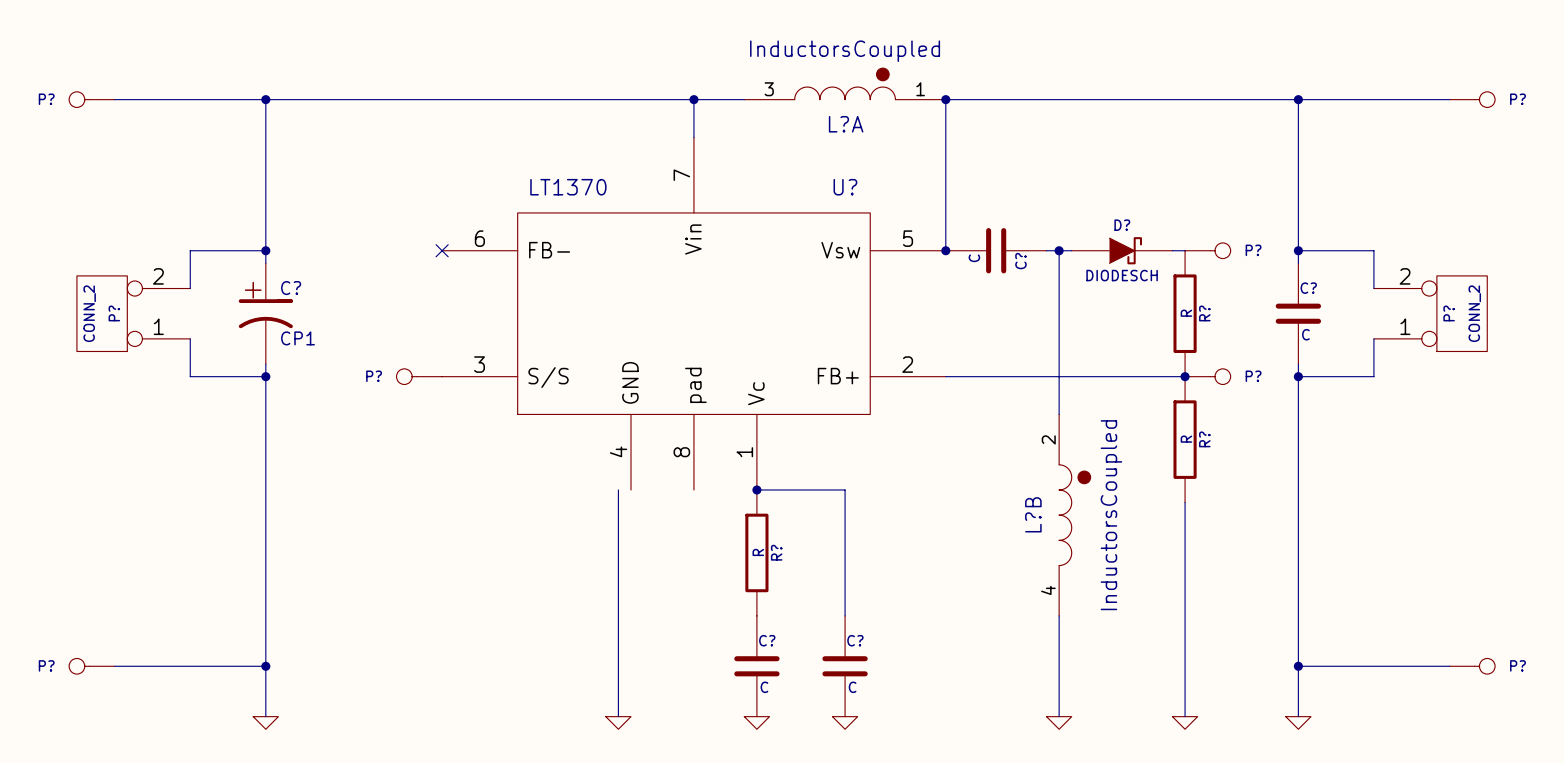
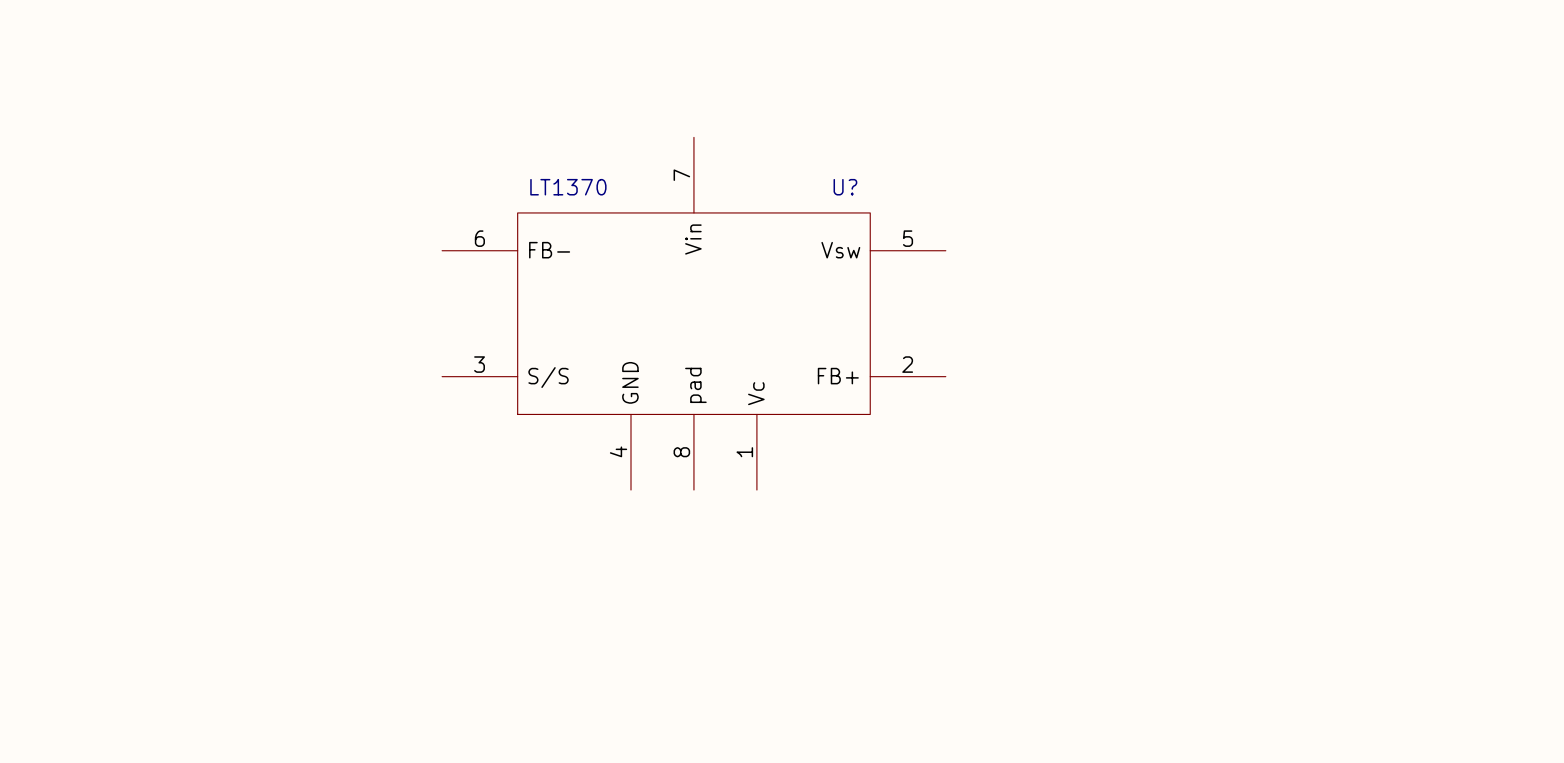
L?A: InductorsCoupled (845, 83) -> none
P?: (91, 99) -> none
wire: (114, 99) (744, 99) -> none
wire: (265, 99) (265, 263) -> none
junction: (265, 99) -> none
wire: (693, 99) (693, 137) -> none
junction: (693, 99) -> none
junction: (945, 99) -> none
wire: (1298, 99) (1298, 263) -> none
junction: (1298, 99) -> none
wire: (1449, 99) (945, 99) (945, 250) -> none
P?: (1472, 99) -> none
wire: (265, 250) (190, 250) (190, 288) -> none
junction: (265, 250) -> none
no-connect mark: (442, 250) -> none
junction: (945, 250) -> none
C?: C (996, 250) -> none
wire: (1046, 250) (1071, 250) -> none
wire: (1059, 250) (1059, 414) -> none
junction: (1059, 250) -> none
D?: DIODESCH (1122, 250) -> none
wire: (1172, 250) (1185, 250) -> none
P?: (1207, 250) -> none
wire: (1298, 250) (1373, 250) (1373, 288) -> none
junction: (1298, 250) -> none
P?: CONN_2 (133, 313) -> none
C?: CP1 (265, 313) -> none
R?: R (1185, 313) -> none
C?: C (1298, 313) -> none
P?: CONN_2 (1430, 313) -> none
wire: (190, 338) (190, 376) (265, 376) -> none
wire: (1373, 338) (1373, 376) (1298, 376) -> none
wire: (265, 364) (265, 716) -> none
wire: (1298, 364) (1298, 716) -> none
junction: (265, 376) -> none
P?: (419, 376) -> none
wire: (945, 376) (1185, 376) -> none
junction: (1185, 376) -> none
P?: (1207, 376) -> none
junction: (1298, 376) -> none
R?: R (1185, 439) -> none
wire: (618, 489) (618, 716) -> none
wire: (756, 489) (845, 489) (845, 615) -> none
junction: (756, 489) -> none
wire: (1185, 502) (1185, 716) -> none
L?B: InductorsCoupled (1074, 515) -> none
R?: R (756, 552) -> none
wire: (1059, 615) (1059, 716) -> none
P?: (91, 666) -> none
wire: (114, 666) (265, 666) -> none
junction: (265, 666) -> none
C?: C (756, 666) -> none
C?: C (845, 666) -> none
wire: (1298, 666) (1449, 666) -> none
junction: (1298, 666) -> none
P?: (1472, 666) -> none
power symbol: (265, 722) -> none
power symbol: (618, 722) -> none
power symbol: (756, 722) -> none
power symbol: (845, 722) -> none
power symbol: (1059, 722) -> none
power symbol: (1185, 722) -> none
power symbol: (1298, 722) -> none

